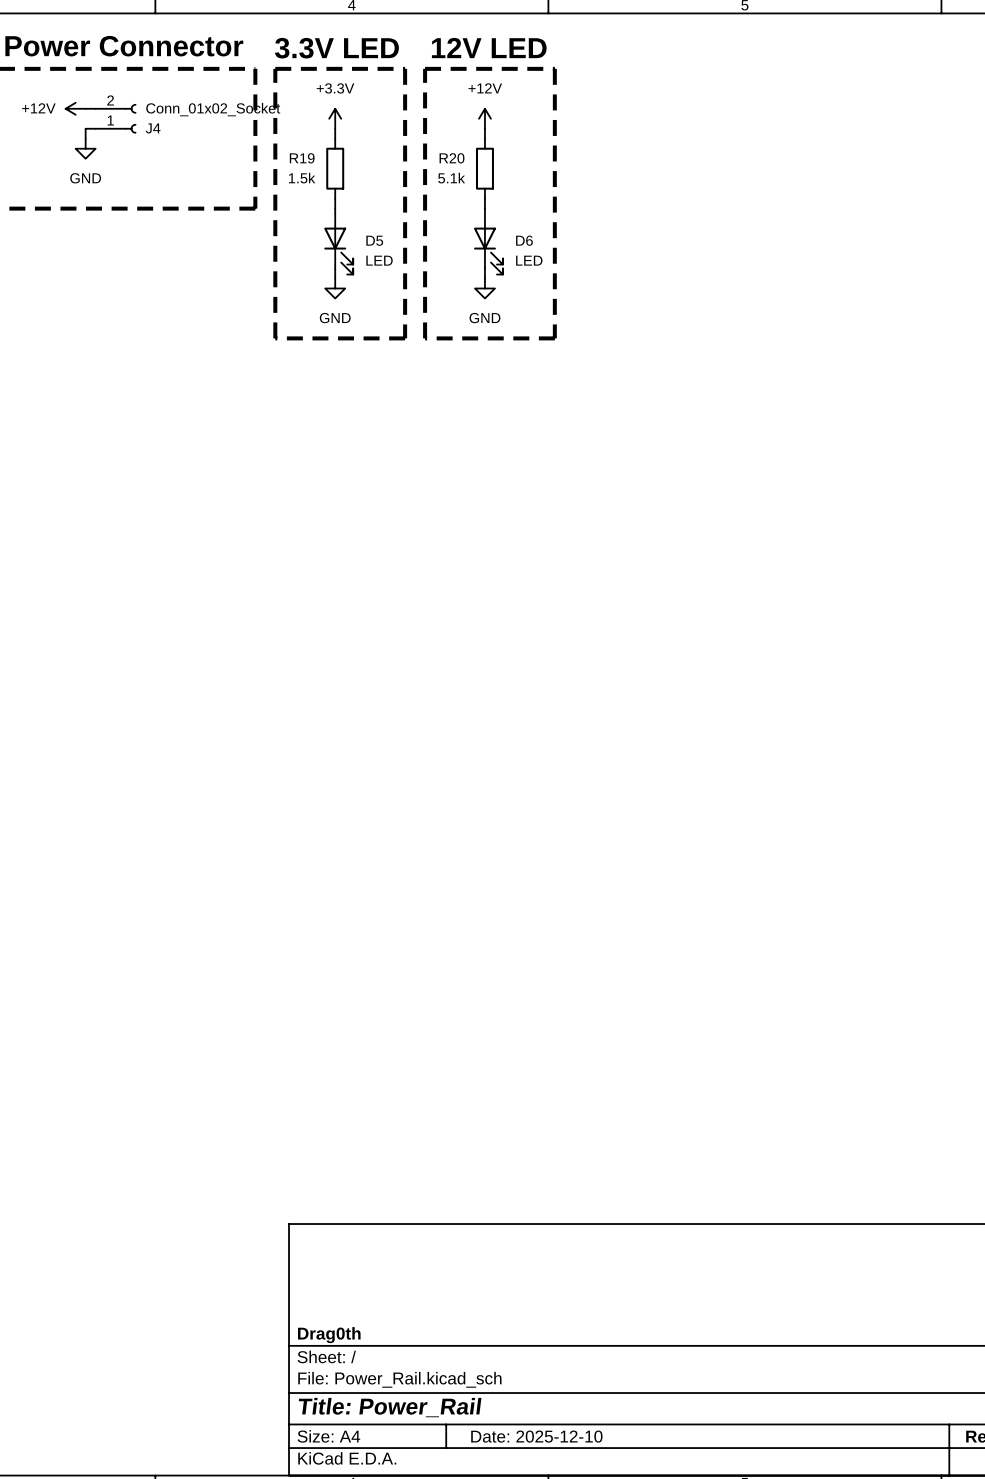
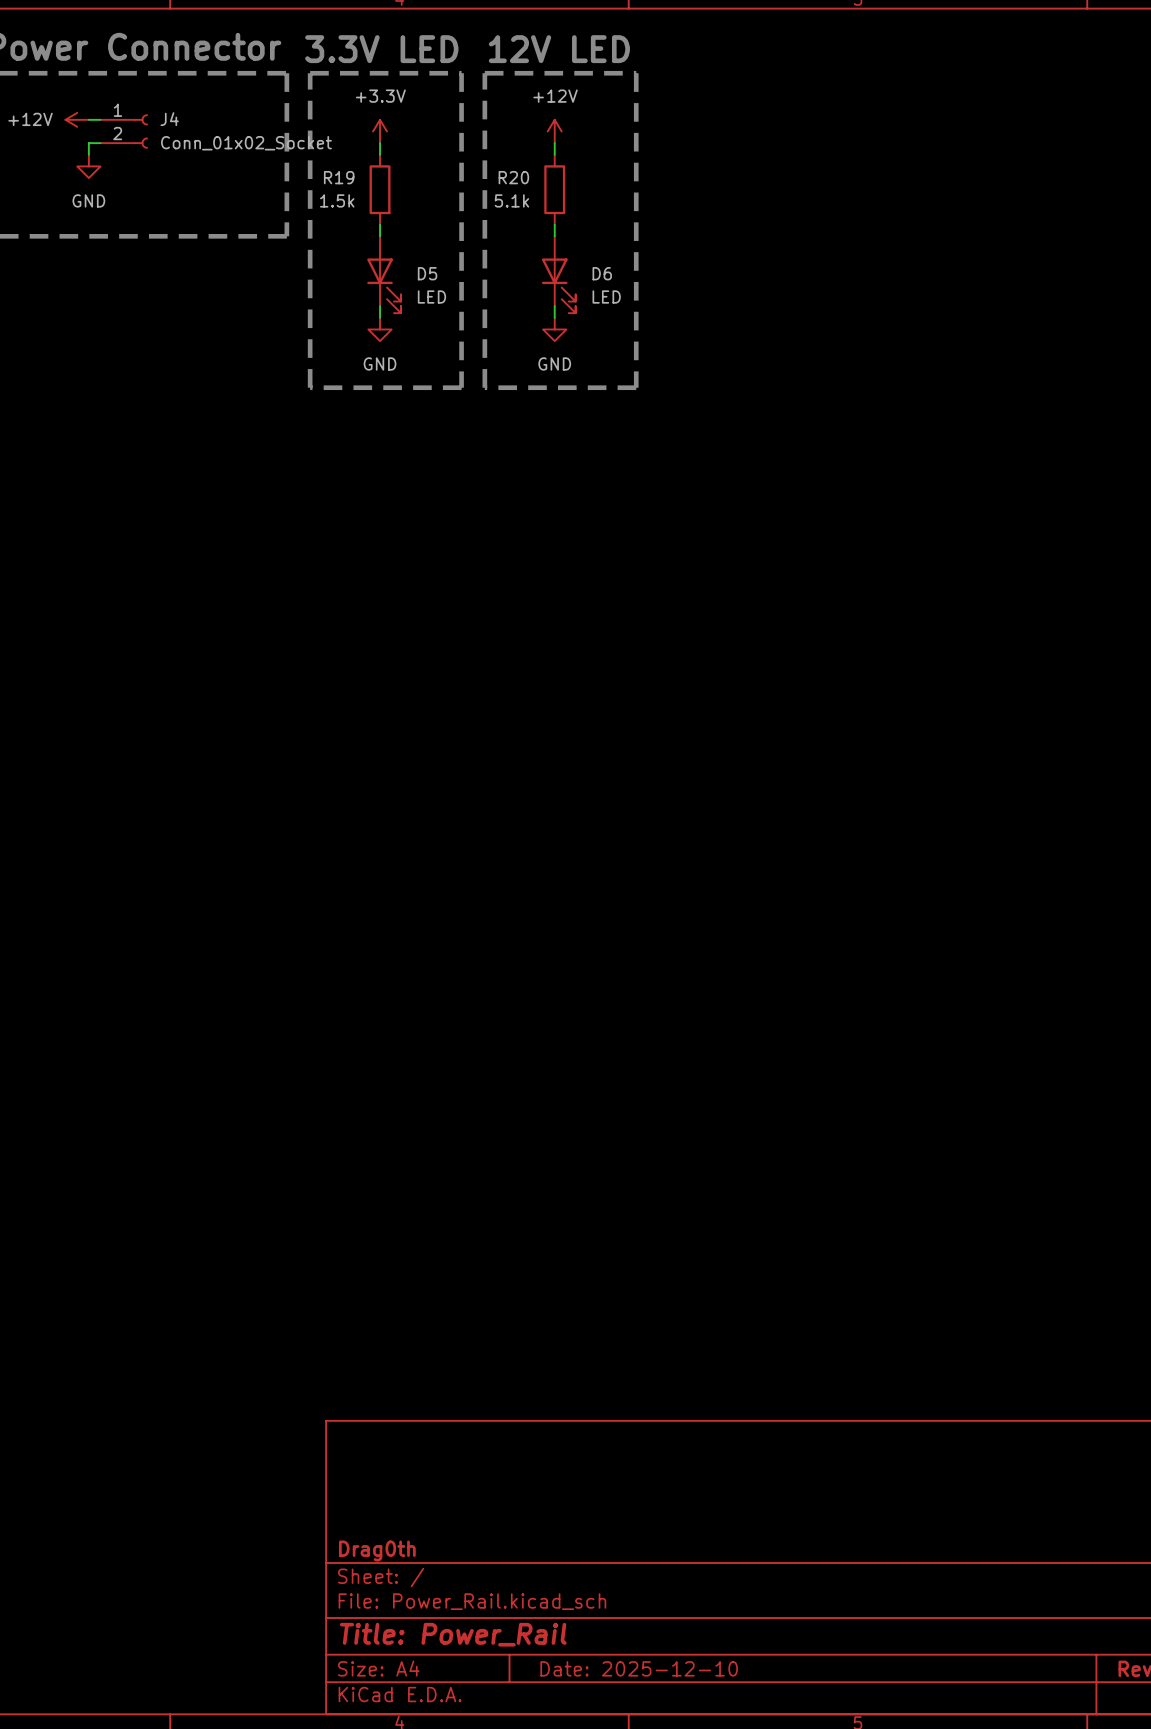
J4 flip: as is (130, 118) -> up-down (141, 131)

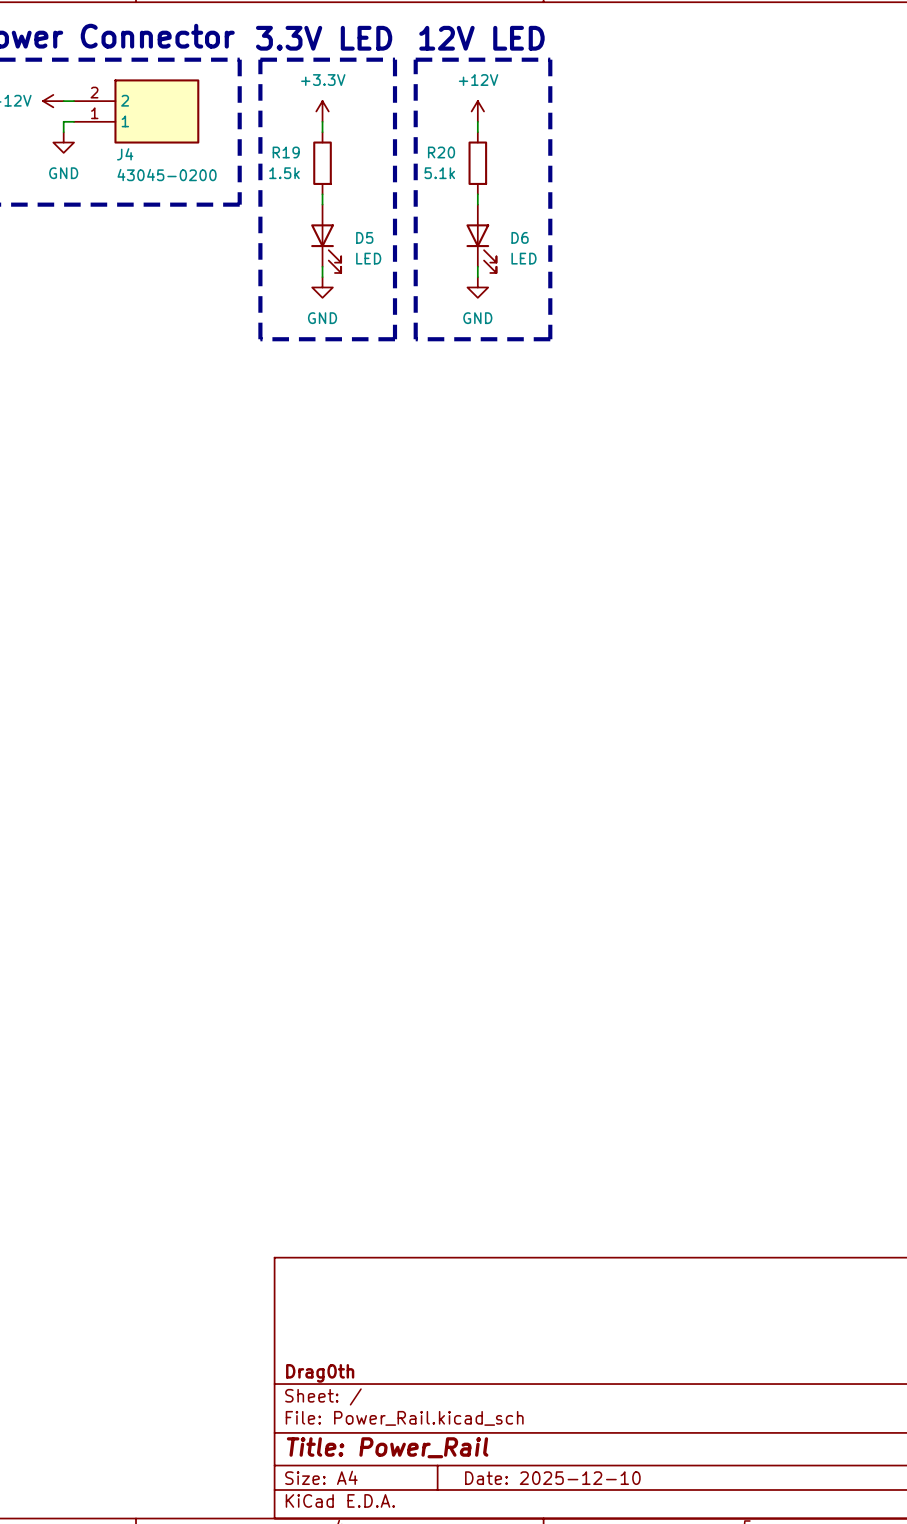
J4 symbol: [100, 114, 148, 149] -> [74, 79, 200, 144]
J4 name position: J4 (169, 119) -> J4 (125, 154)
J4 value: Conn_01x02_Socket (246, 143) -> 43045-0200 (167, 175)

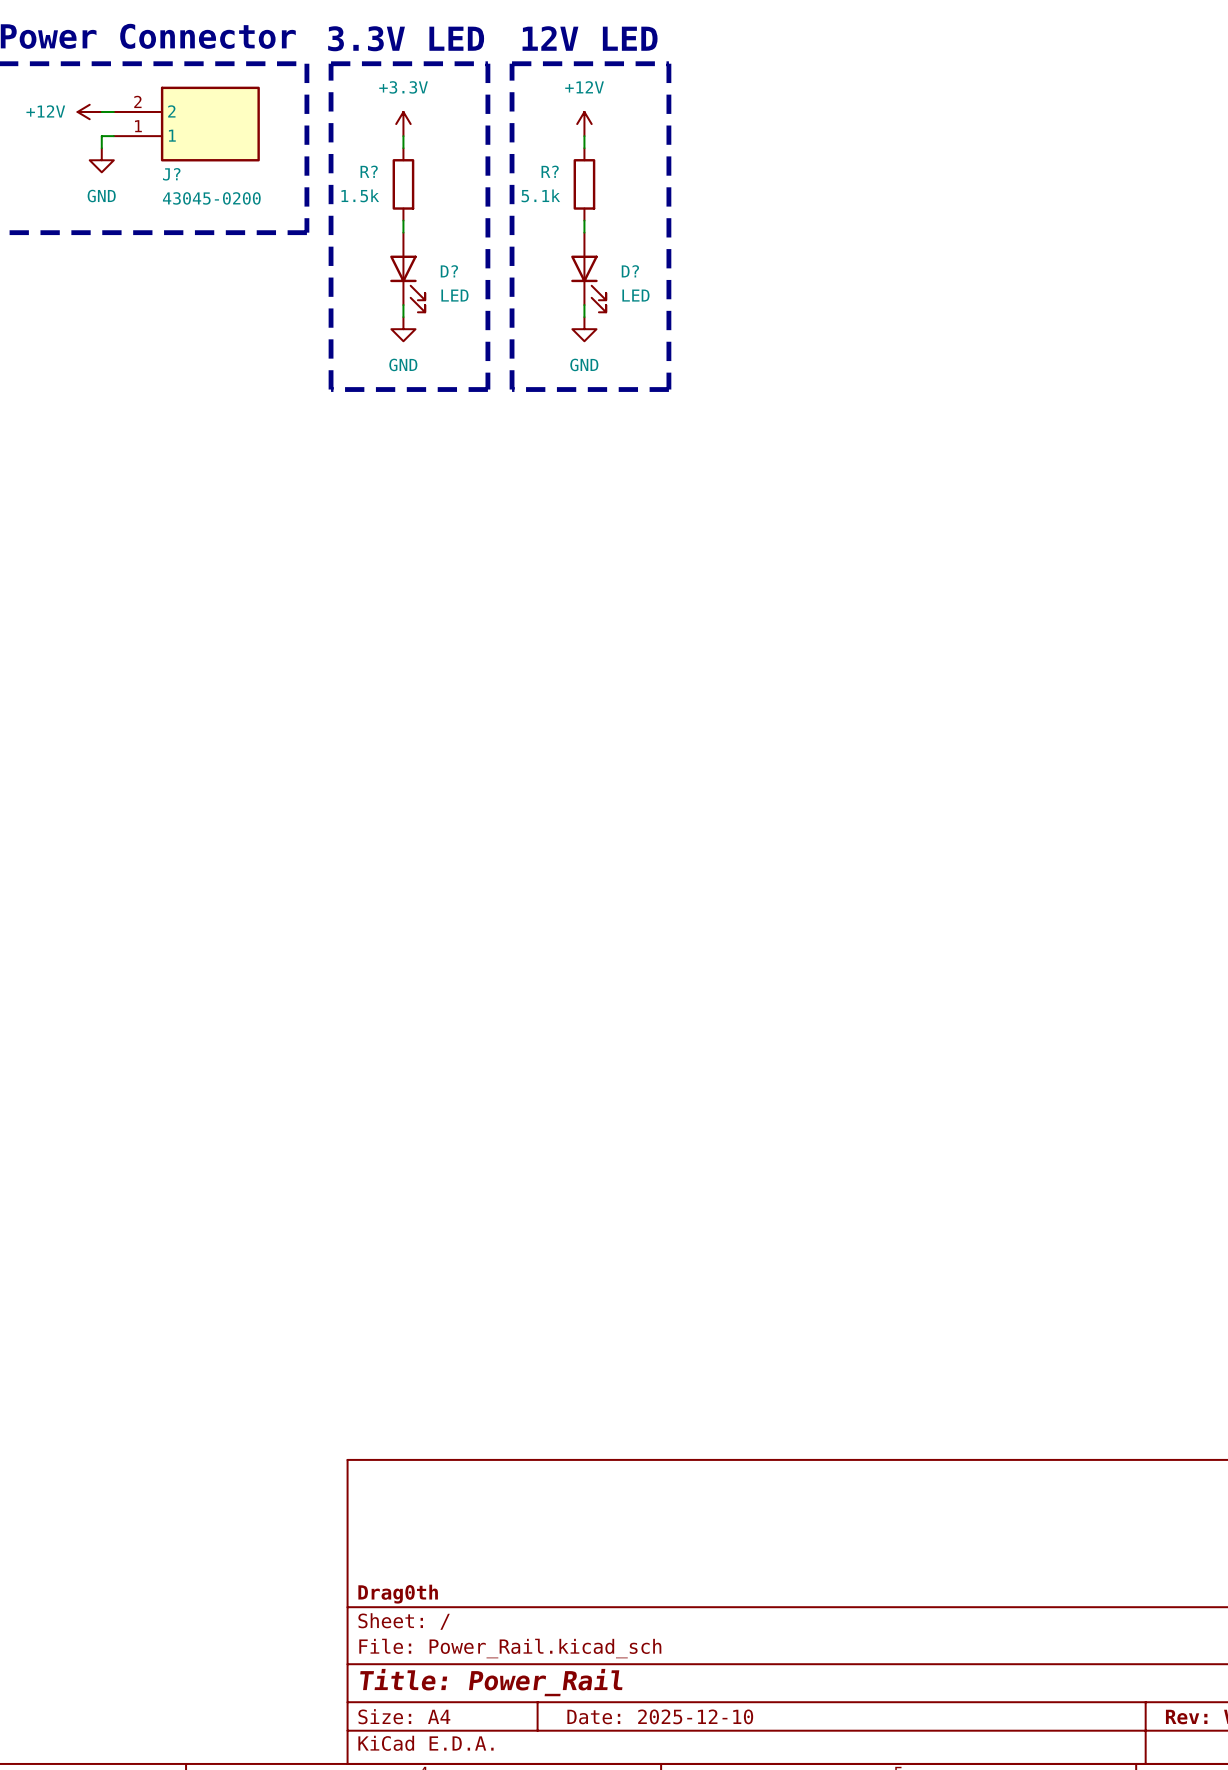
R19 name: R19 (286, 152) -> R? (369, 171)
R20 name: R20 (441, 152) -> R? (550, 171)
J4 name: J4 (125, 154) -> J? (171, 174)
D5 name: D5 (364, 237) -> D? (449, 271)
D6 name: D6 (520, 237) -> D? (630, 271)

